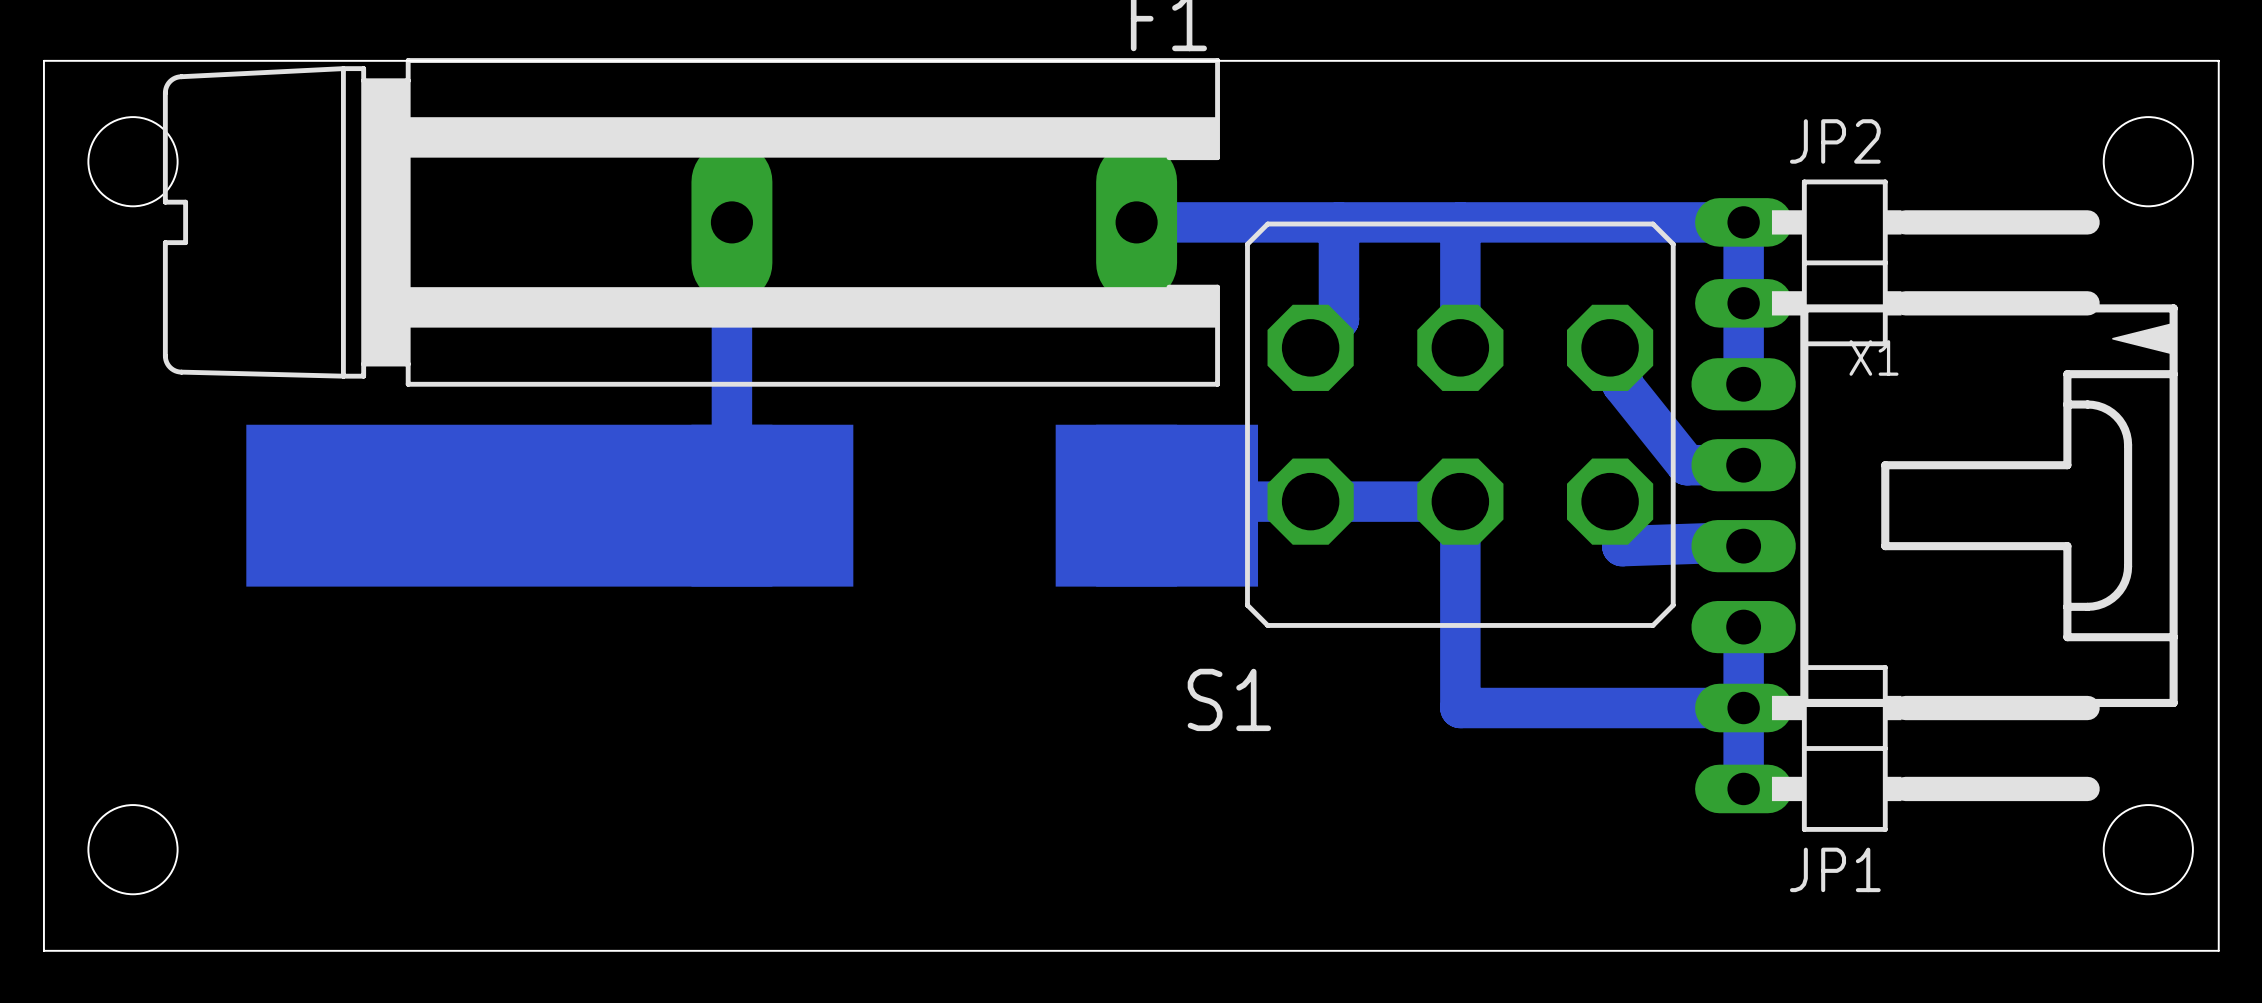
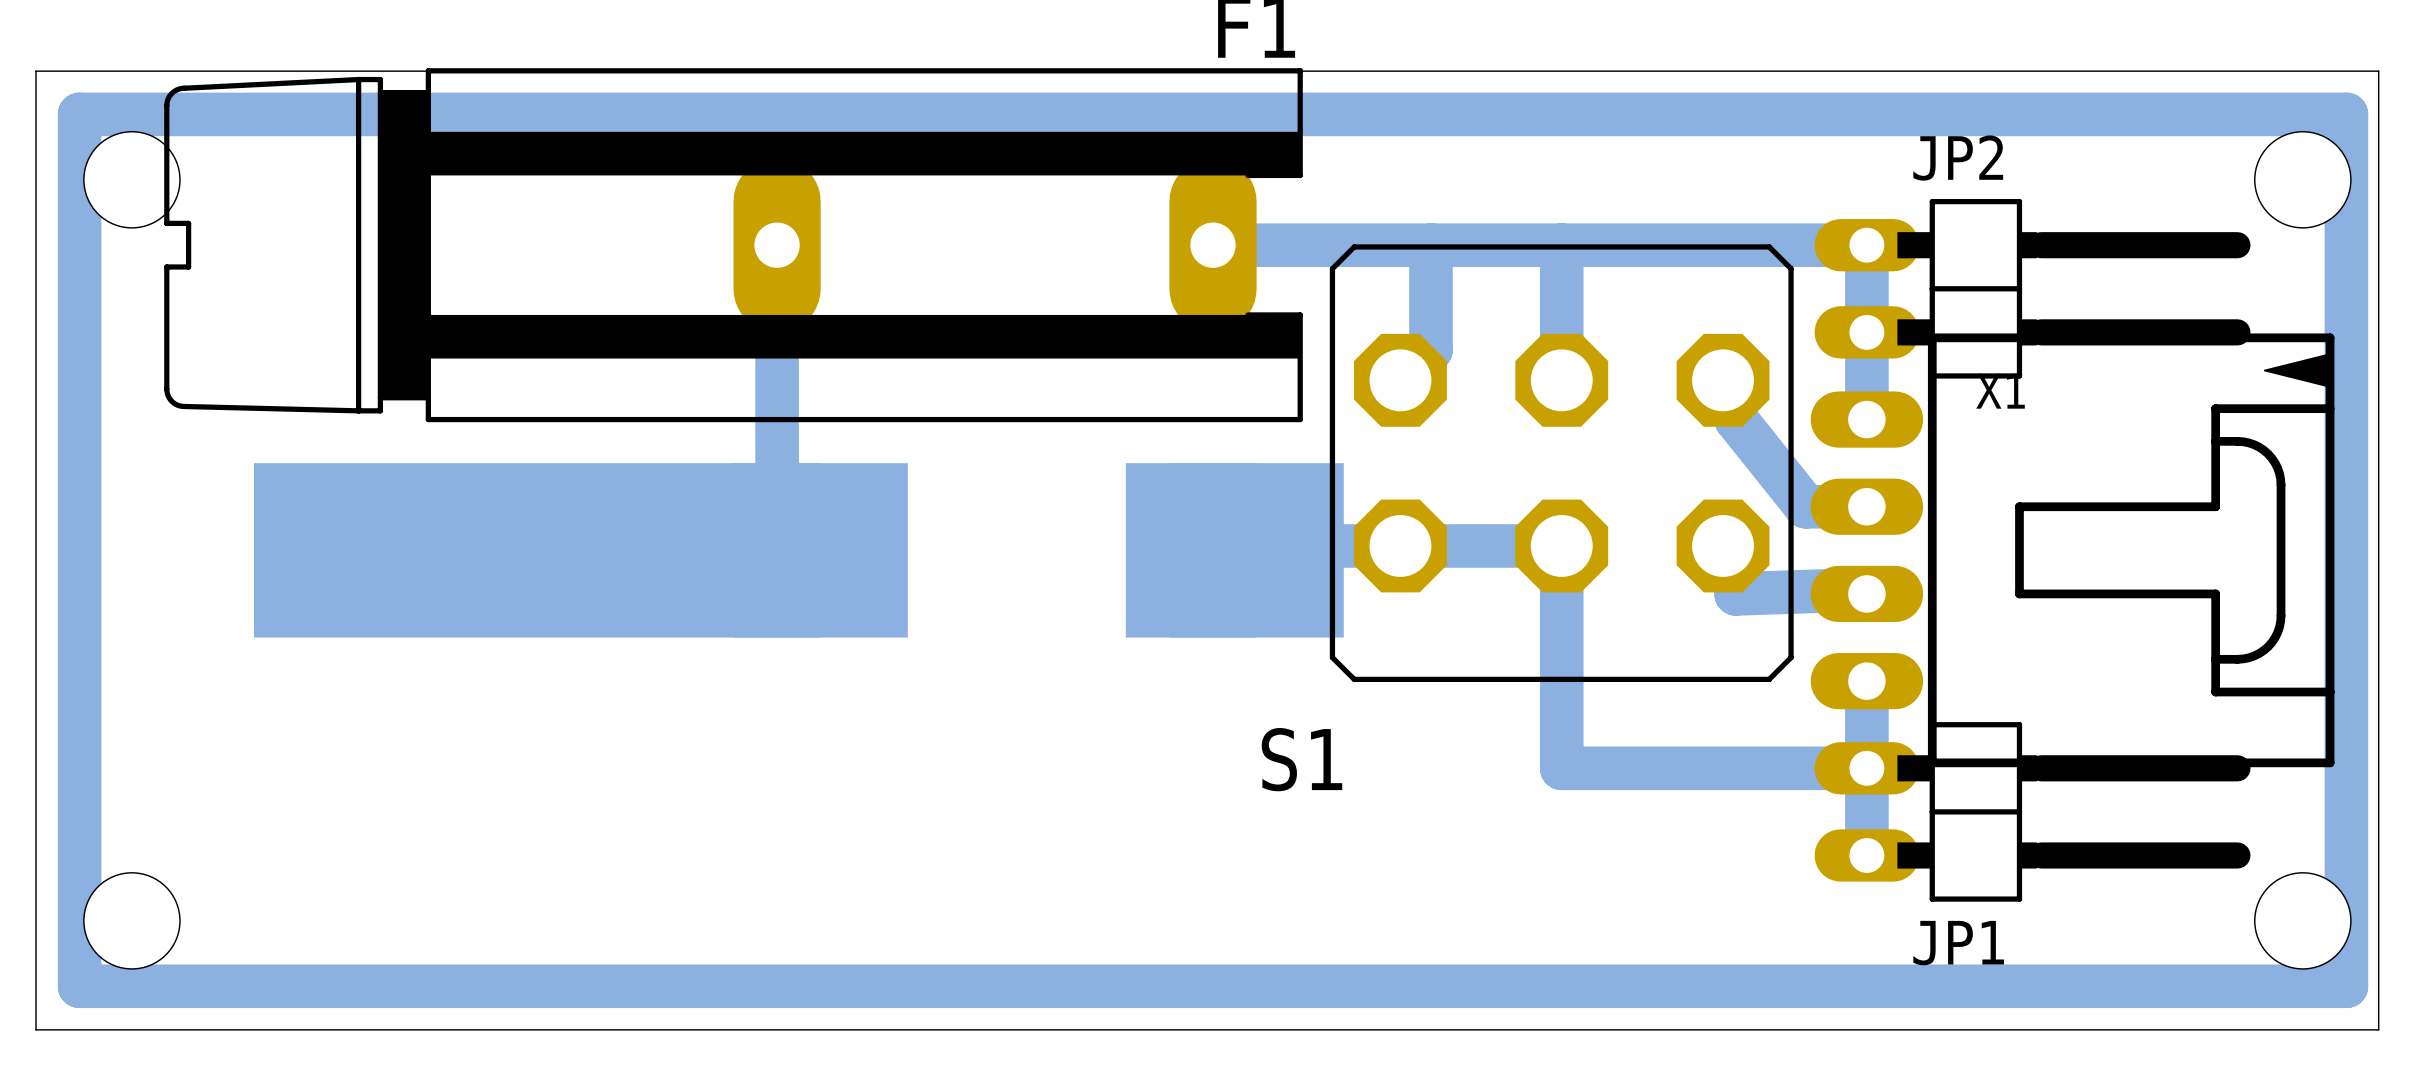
bottom track: none -> (79, 114) (2346, 114) (2346, 986) (79, 986) (79, 114)

